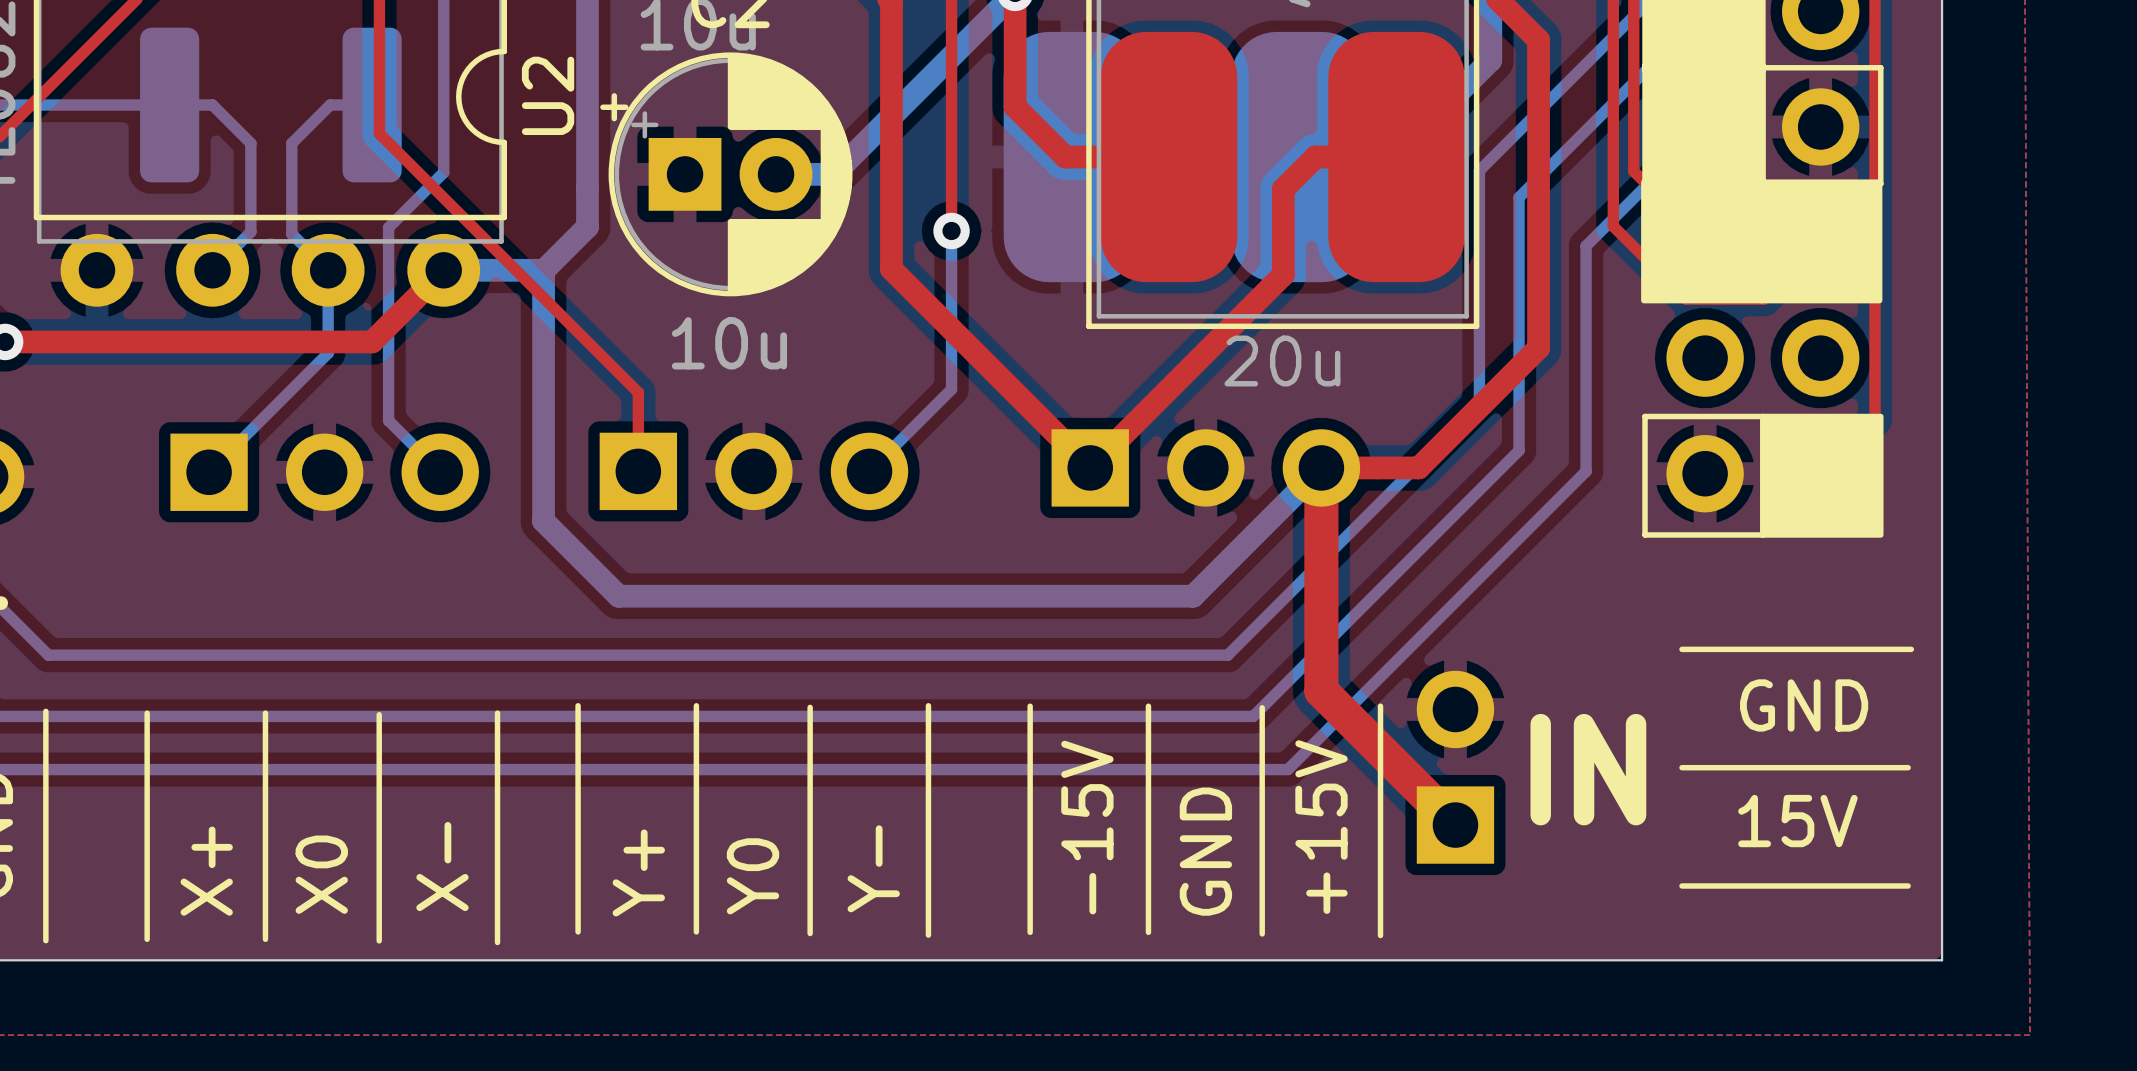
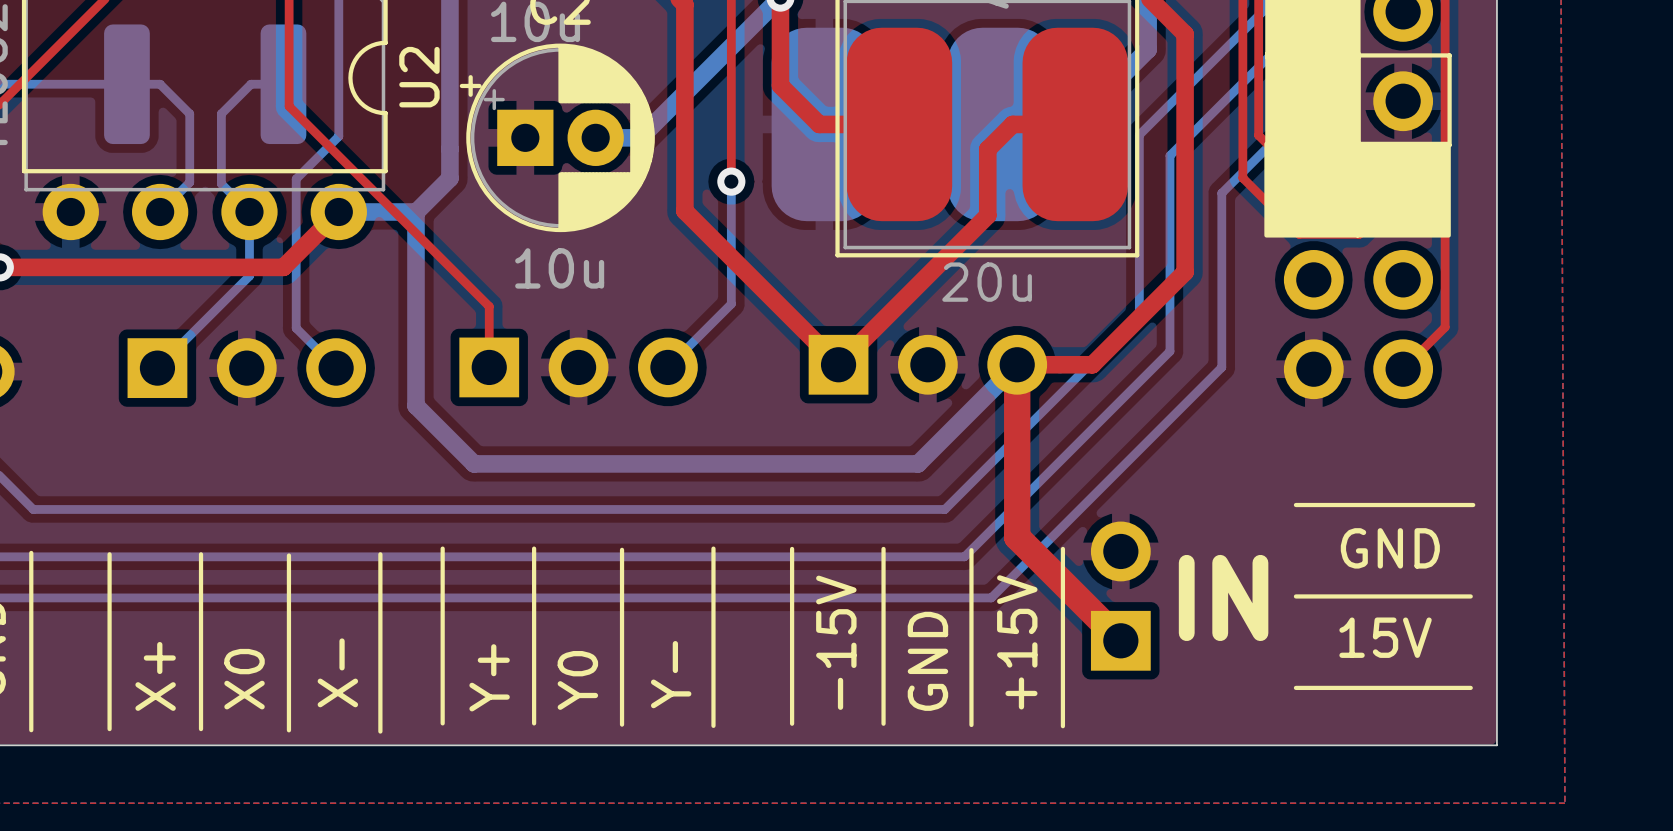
drawing: [1760, 413, 1884, 538] -> none
line: (1645, 416) (1762, 416) (1762, 534) (1645, 534) (1645, 416) -> none

